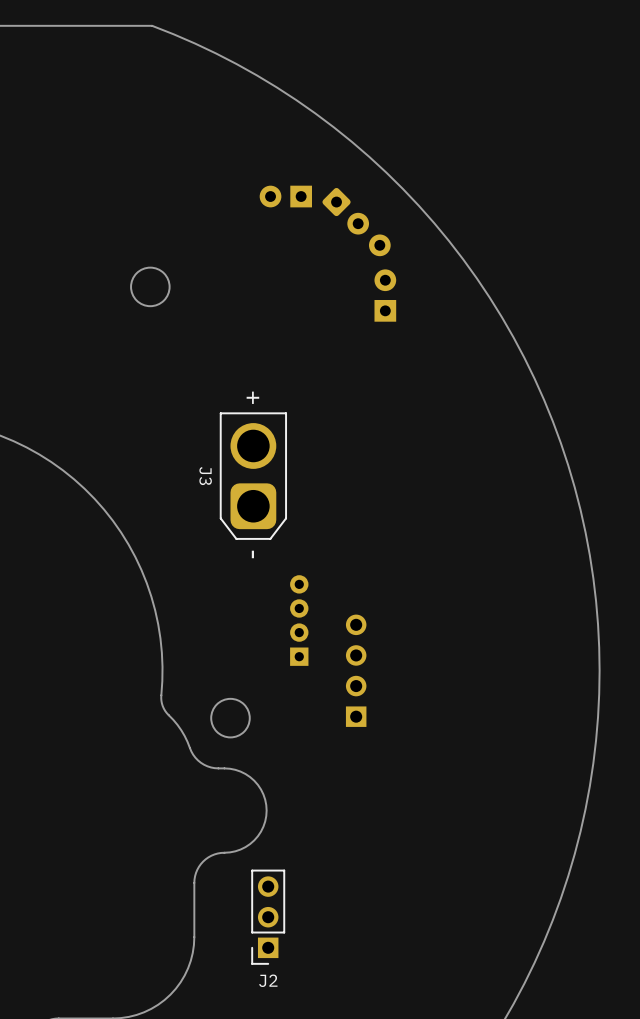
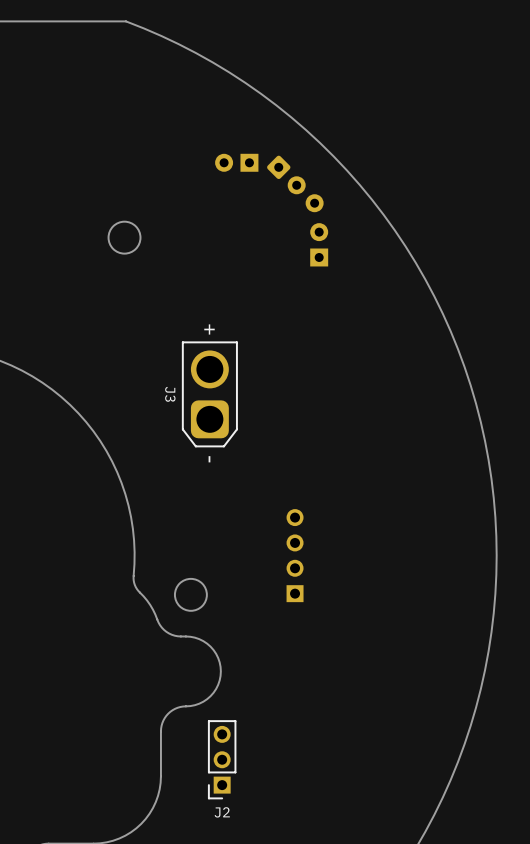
part: (299, 620) -> none

